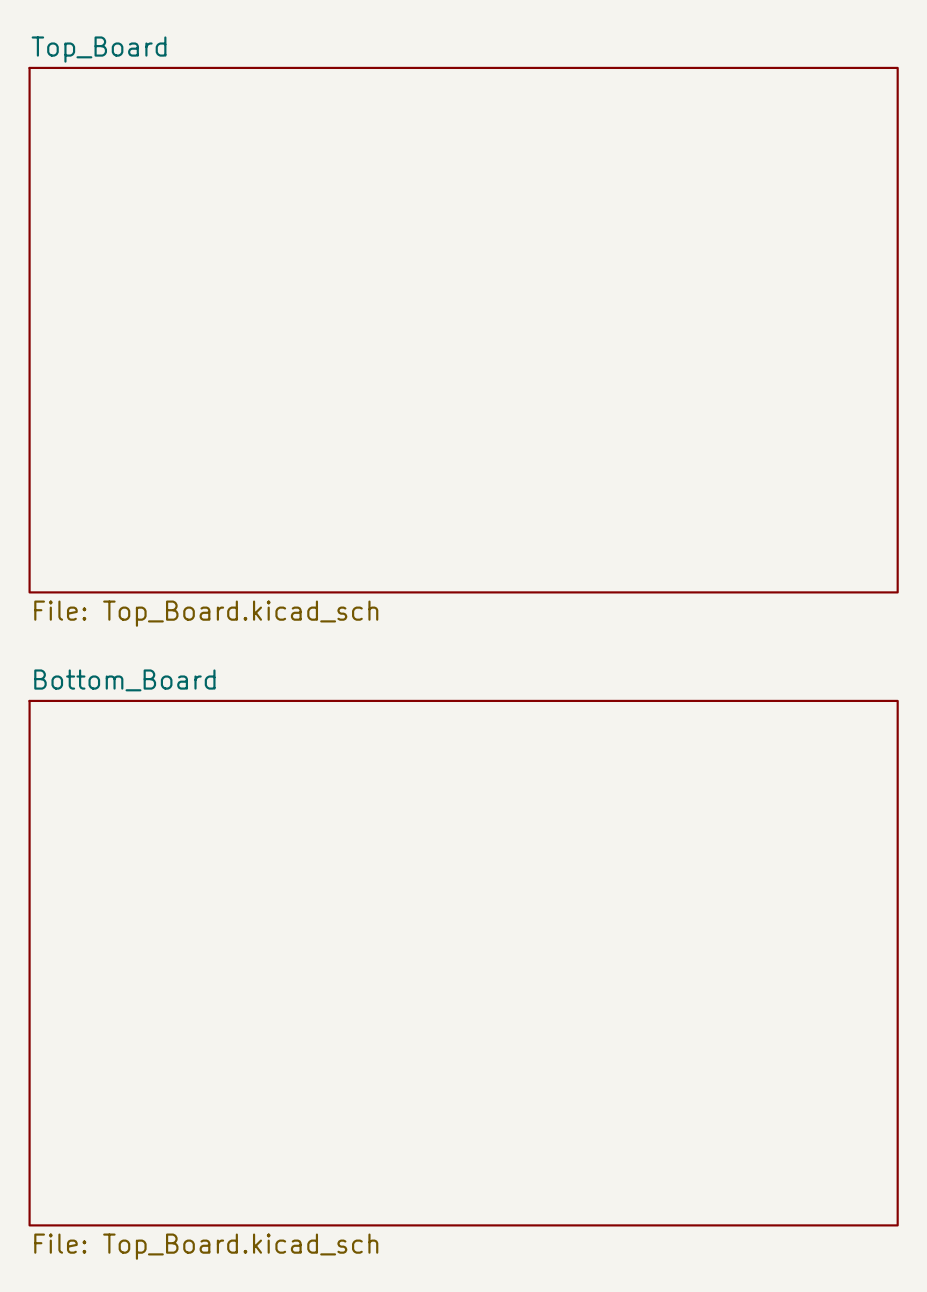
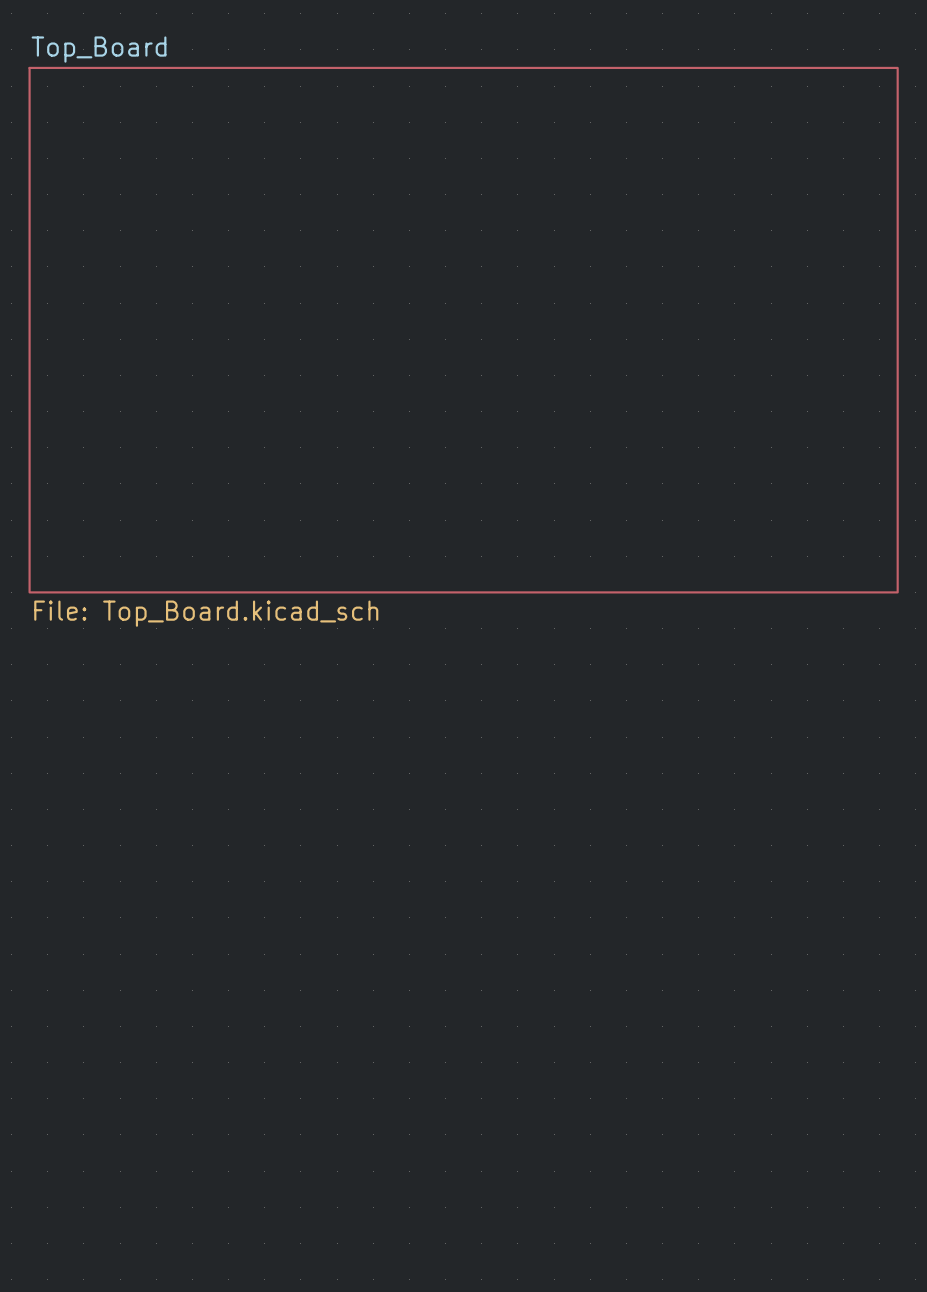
sheet Bottom_Board: File: Top_Board.kicad_sch (463, 963) -> none

